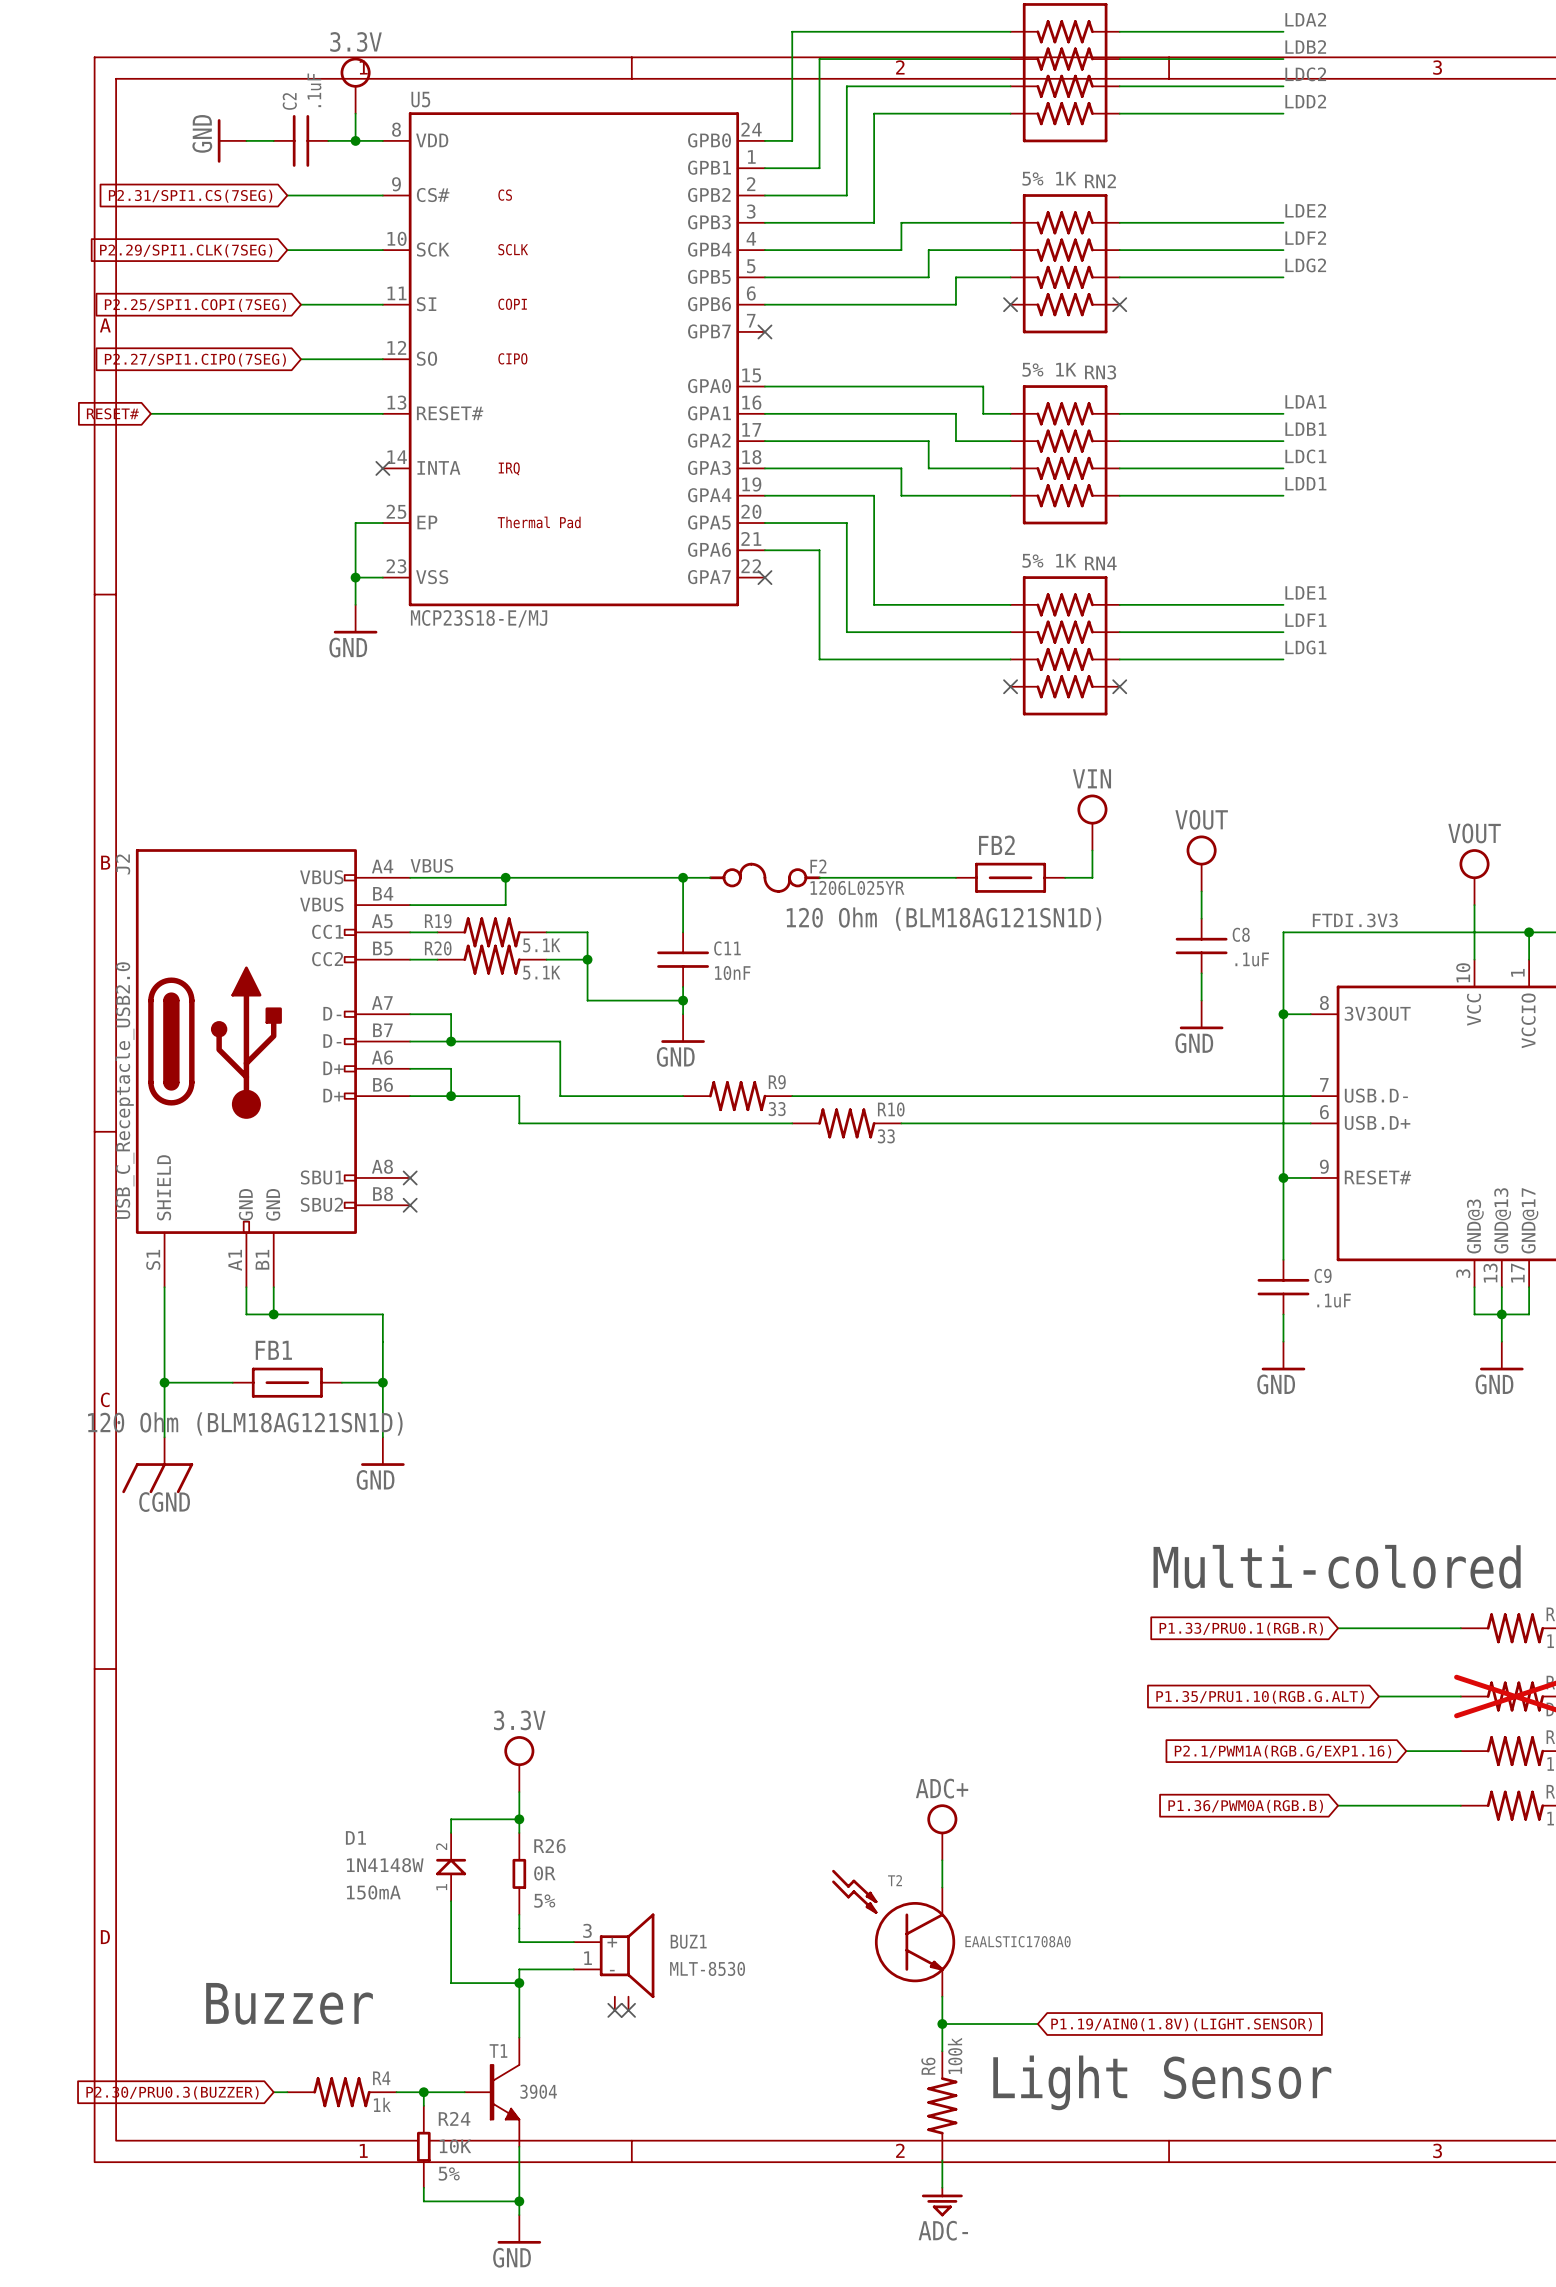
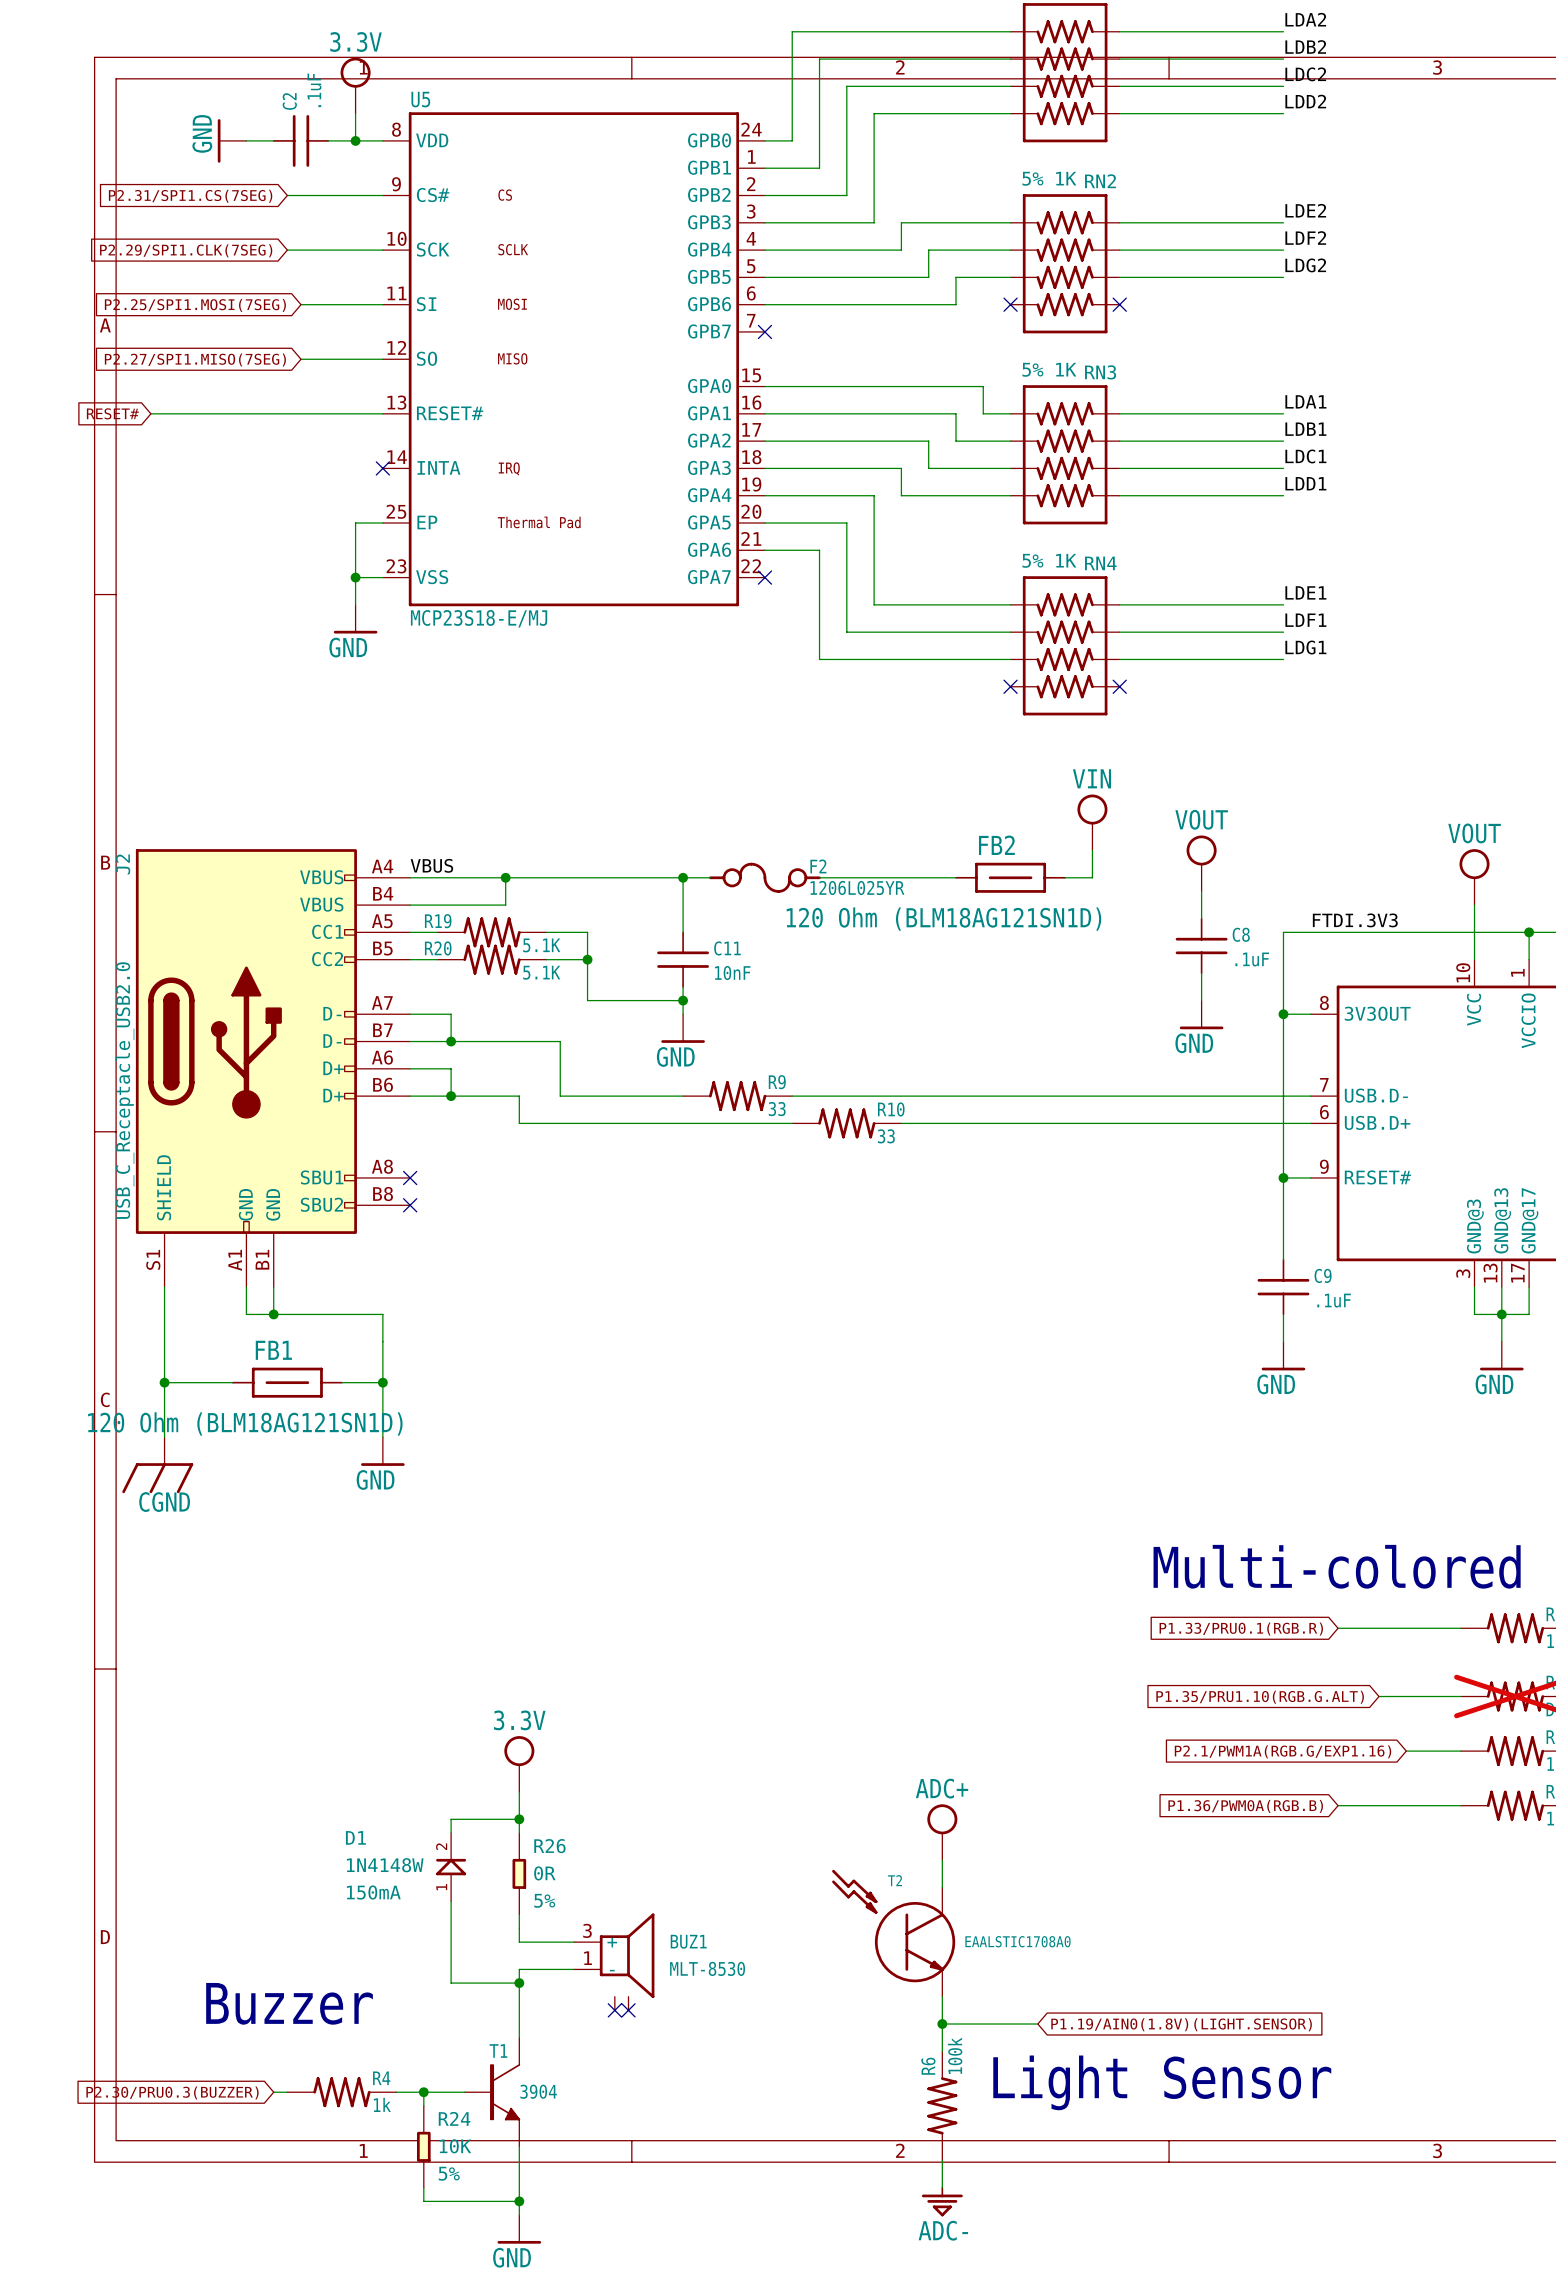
U5 text: COPI (512, 304) -> MOSI (512, 304)
global label: P2.25/SPI1.COPI(7SEG) (195, 305) -> P2.25/SPI1.MOSI(7SEG) (195, 305)
U5 text: CIPO (512, 358) -> MISO (512, 358)
global label: P2.27/SPI1.CIPO(7SEG) (195, 360) -> P2.27/SPI1.MISO(7SEG) (195, 360)

